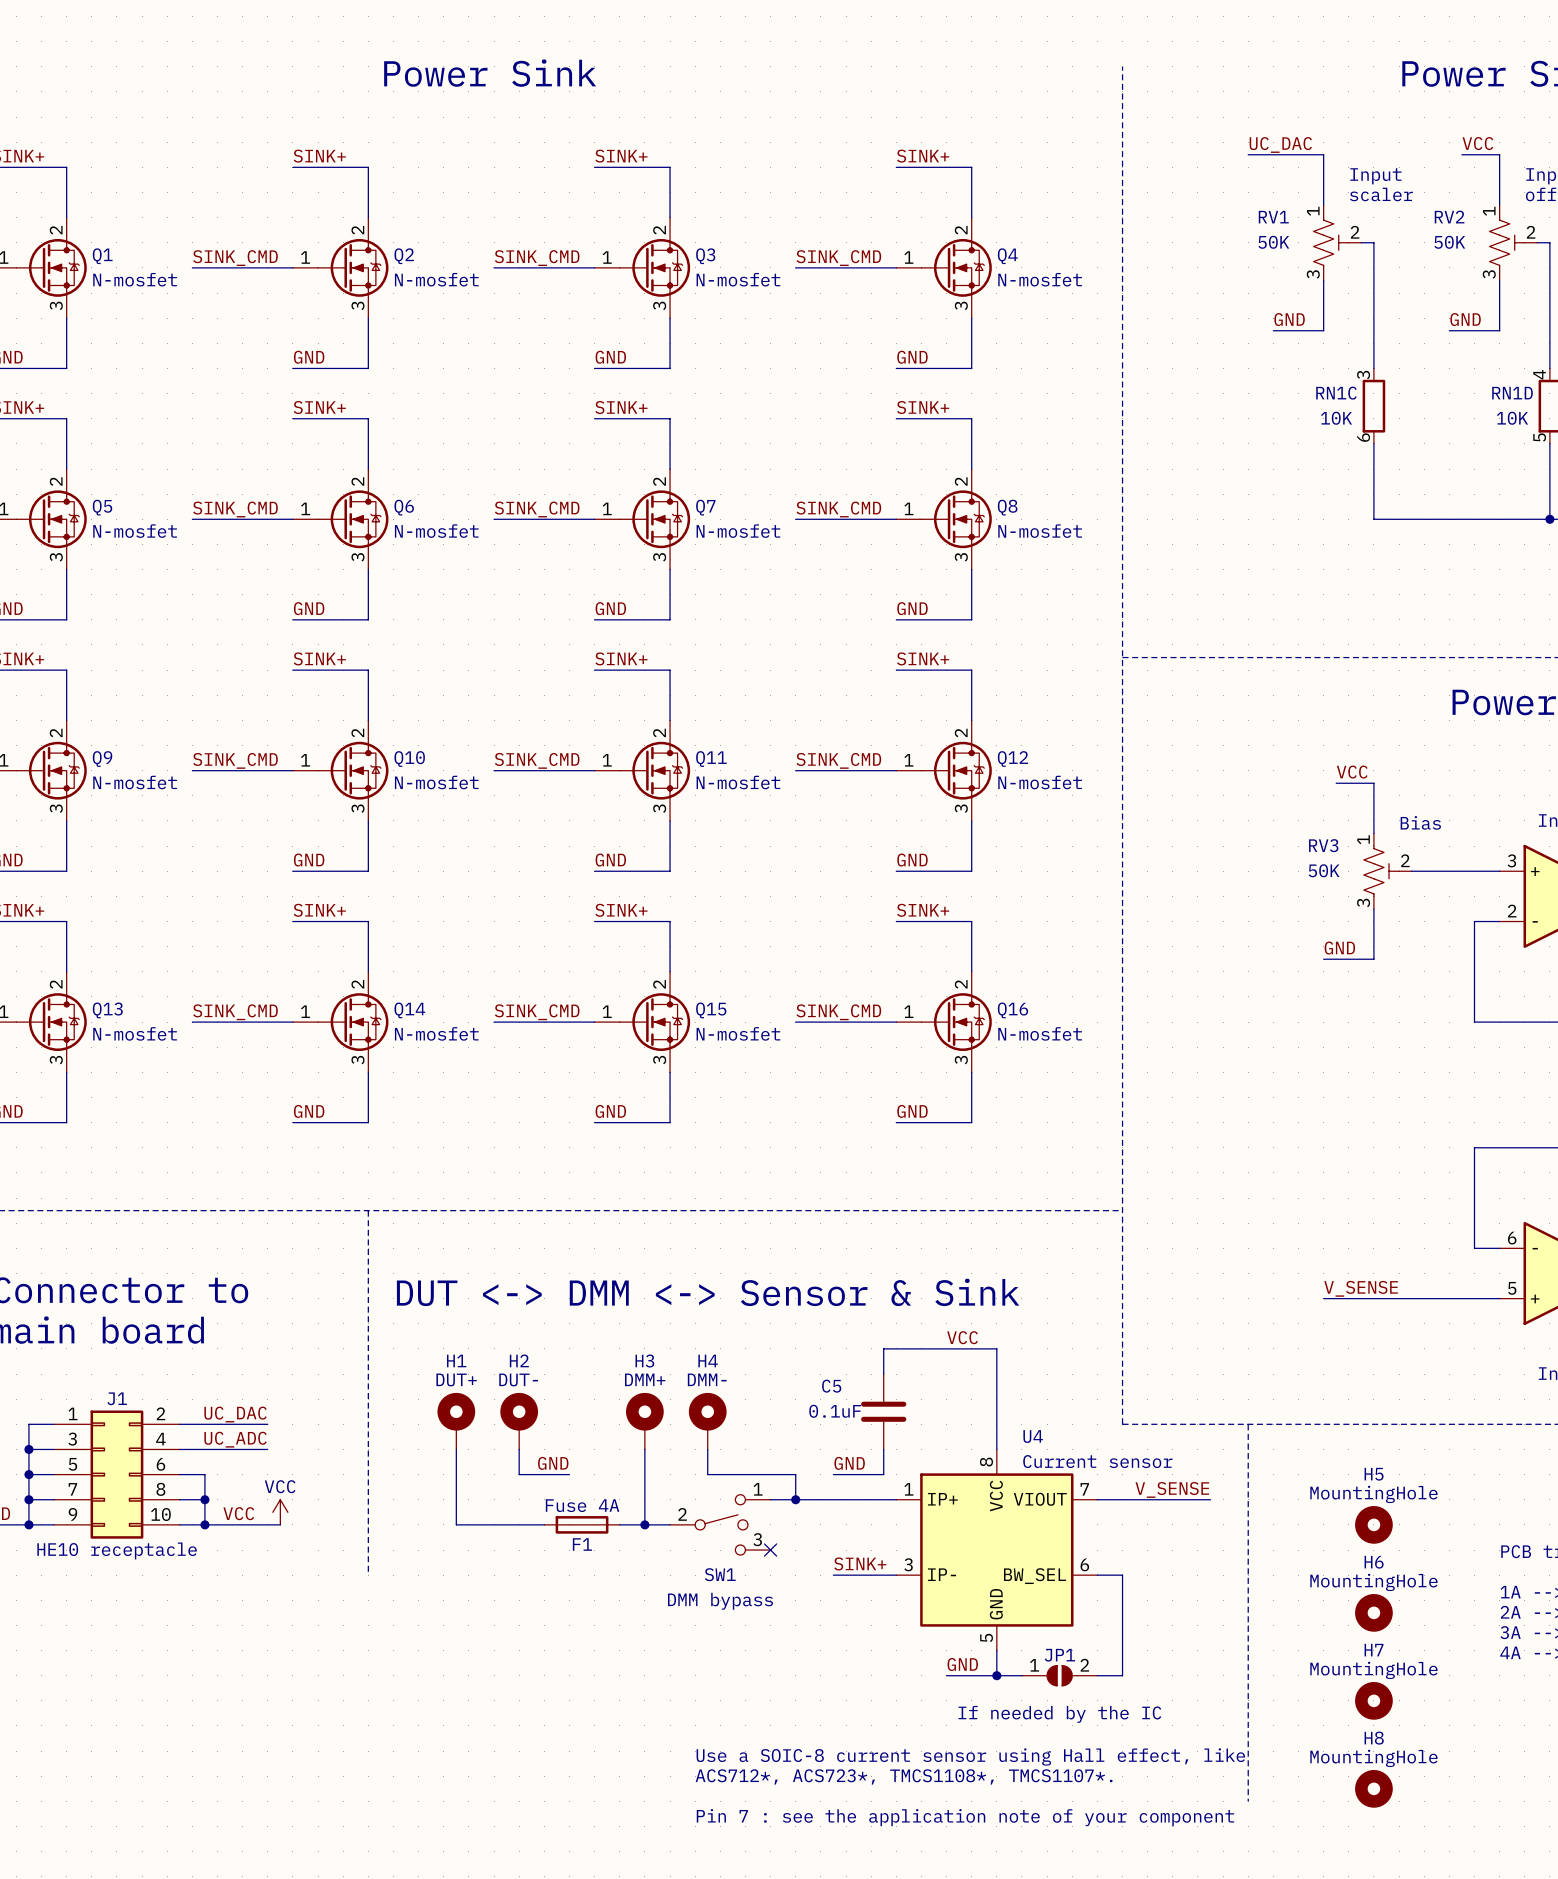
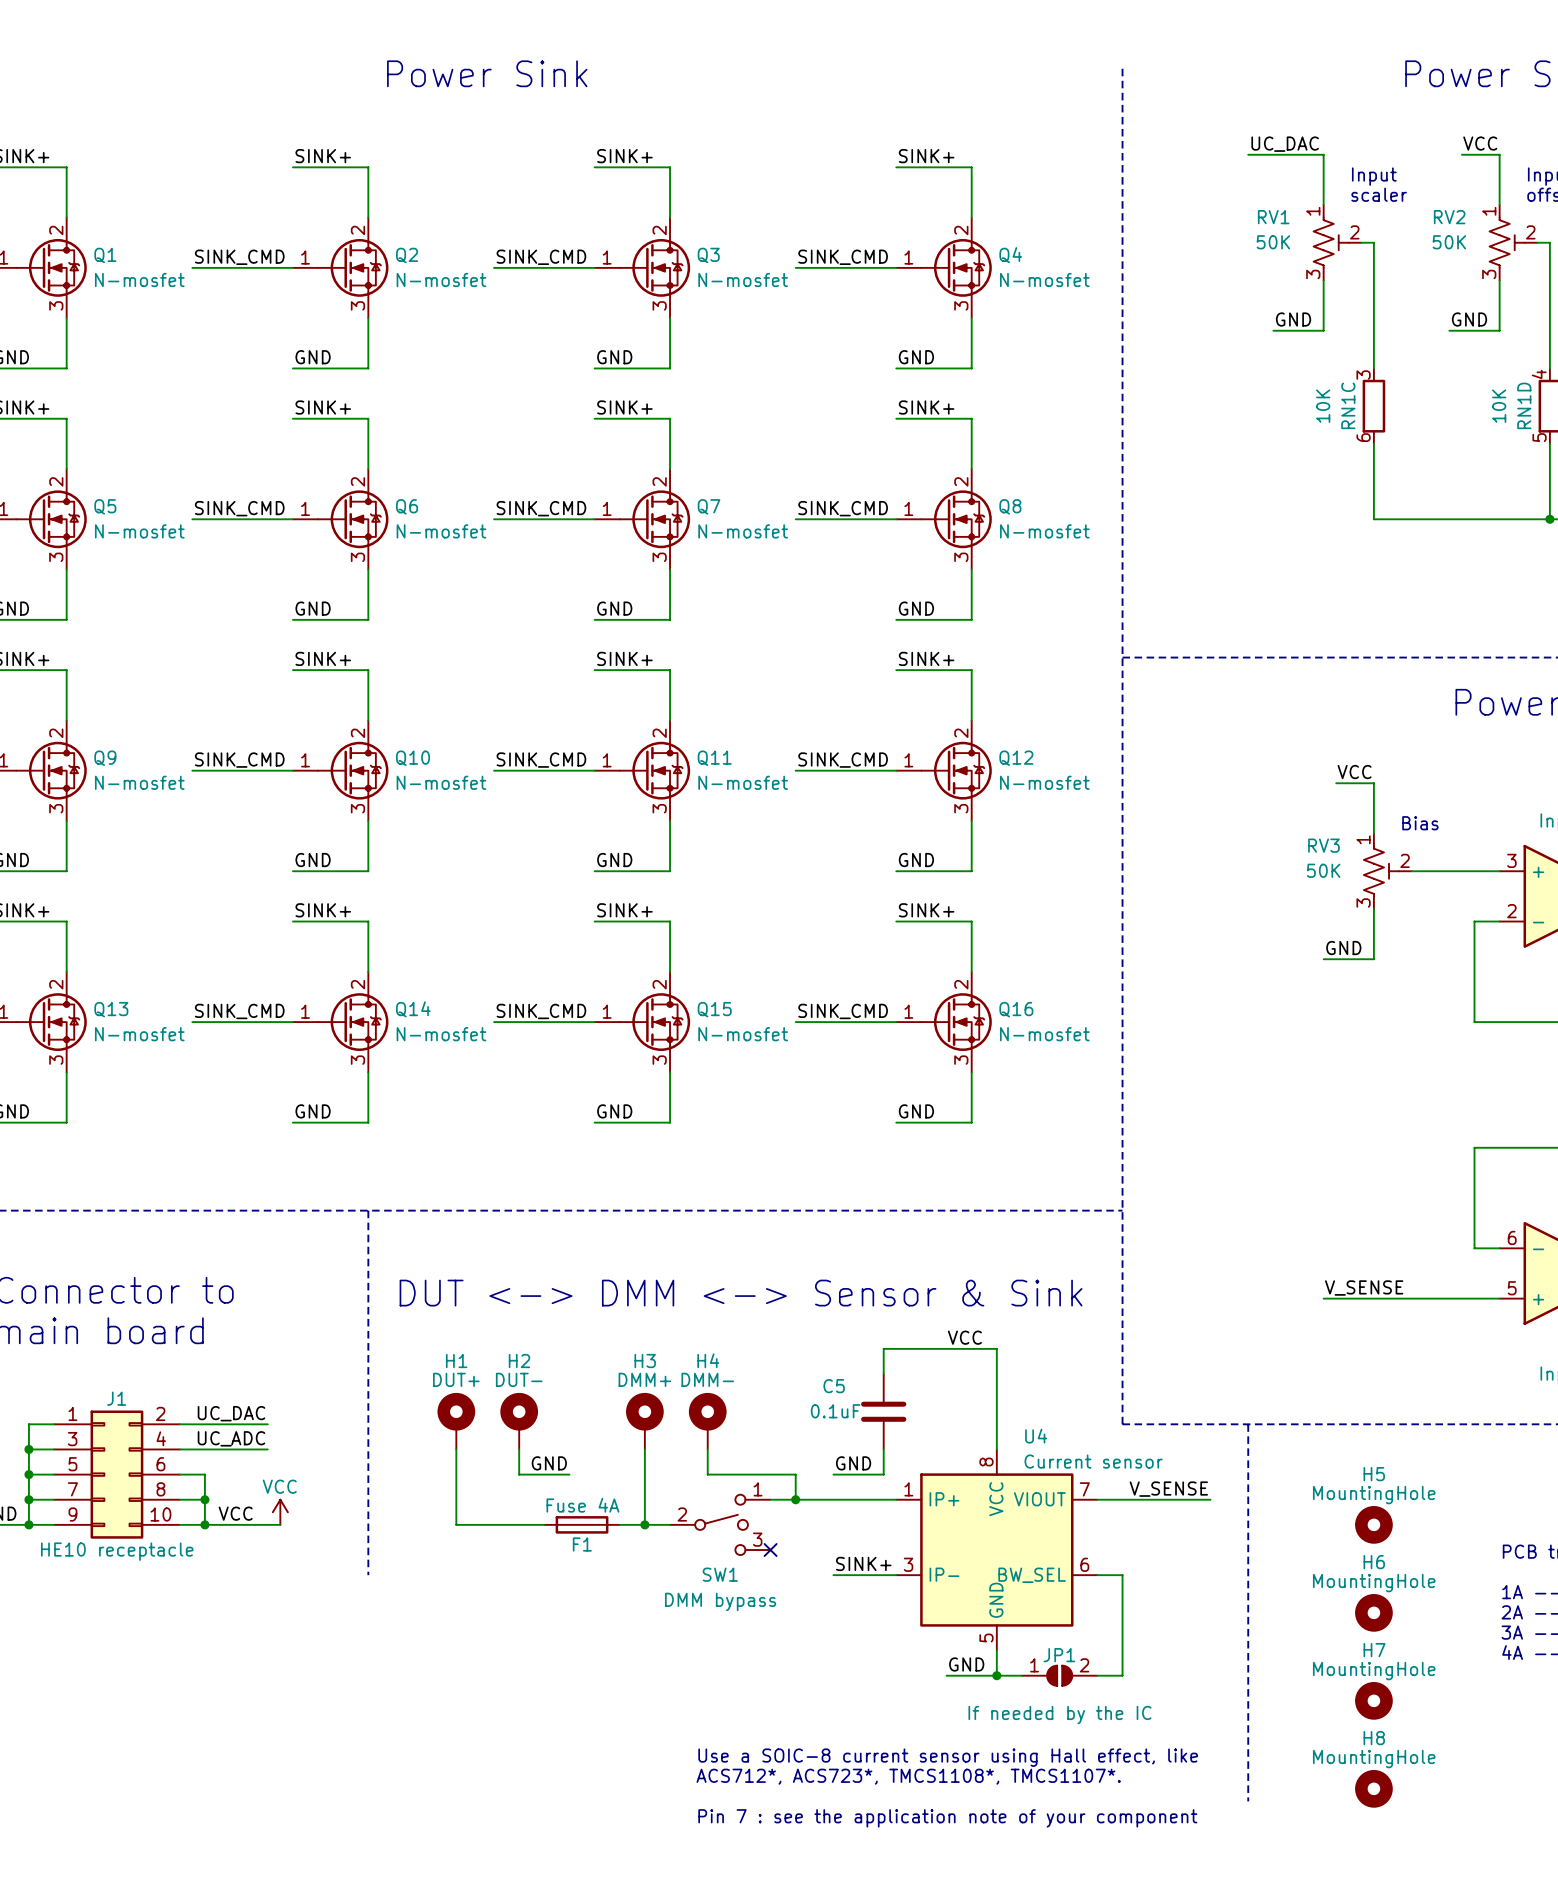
RN1C name rotation: 0° (1336, 393) -> 90° counterclockwise (1348, 405)
RN1D name rotation: 0° (1512, 393) -> 90° counterclockwise (1524, 405)
RN1C value rotation: 0° (1336, 418) -> 90° counterclockwise (1323, 406)
RN1D value rotation: 0° (1512, 418) -> 90° counterclockwise (1499, 406)

